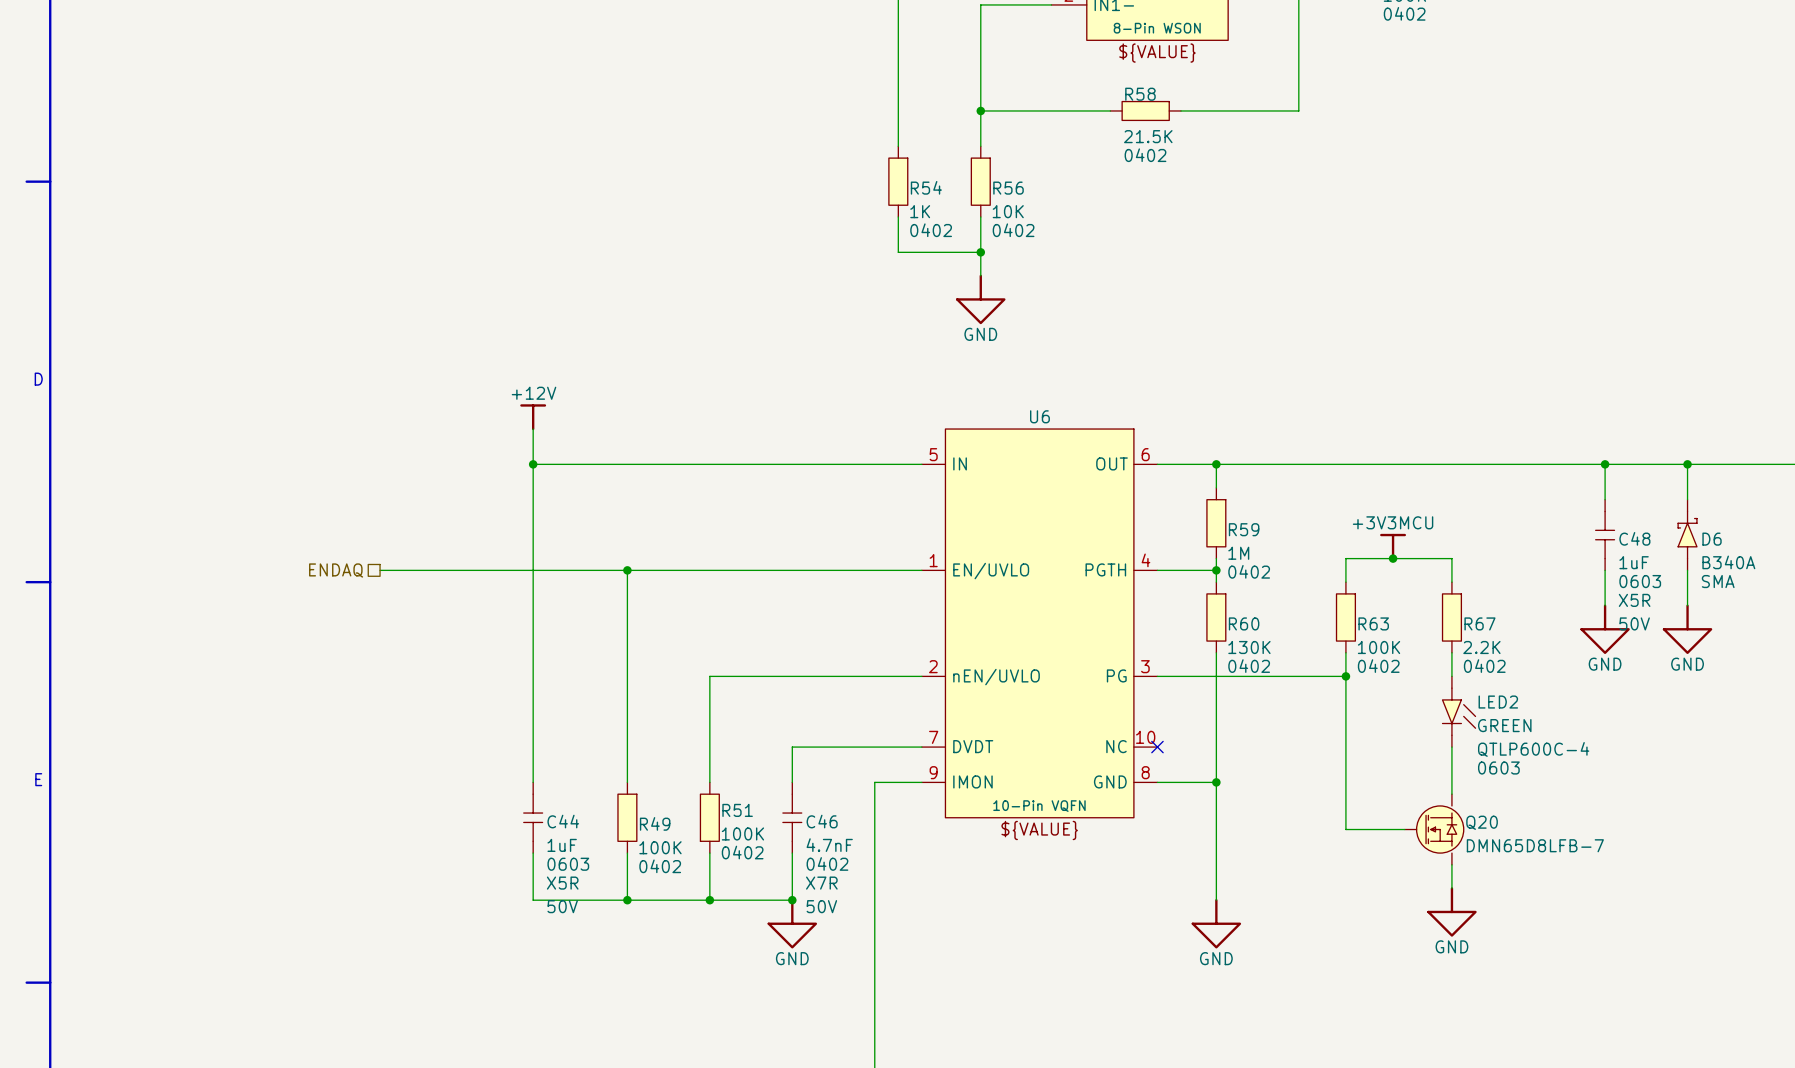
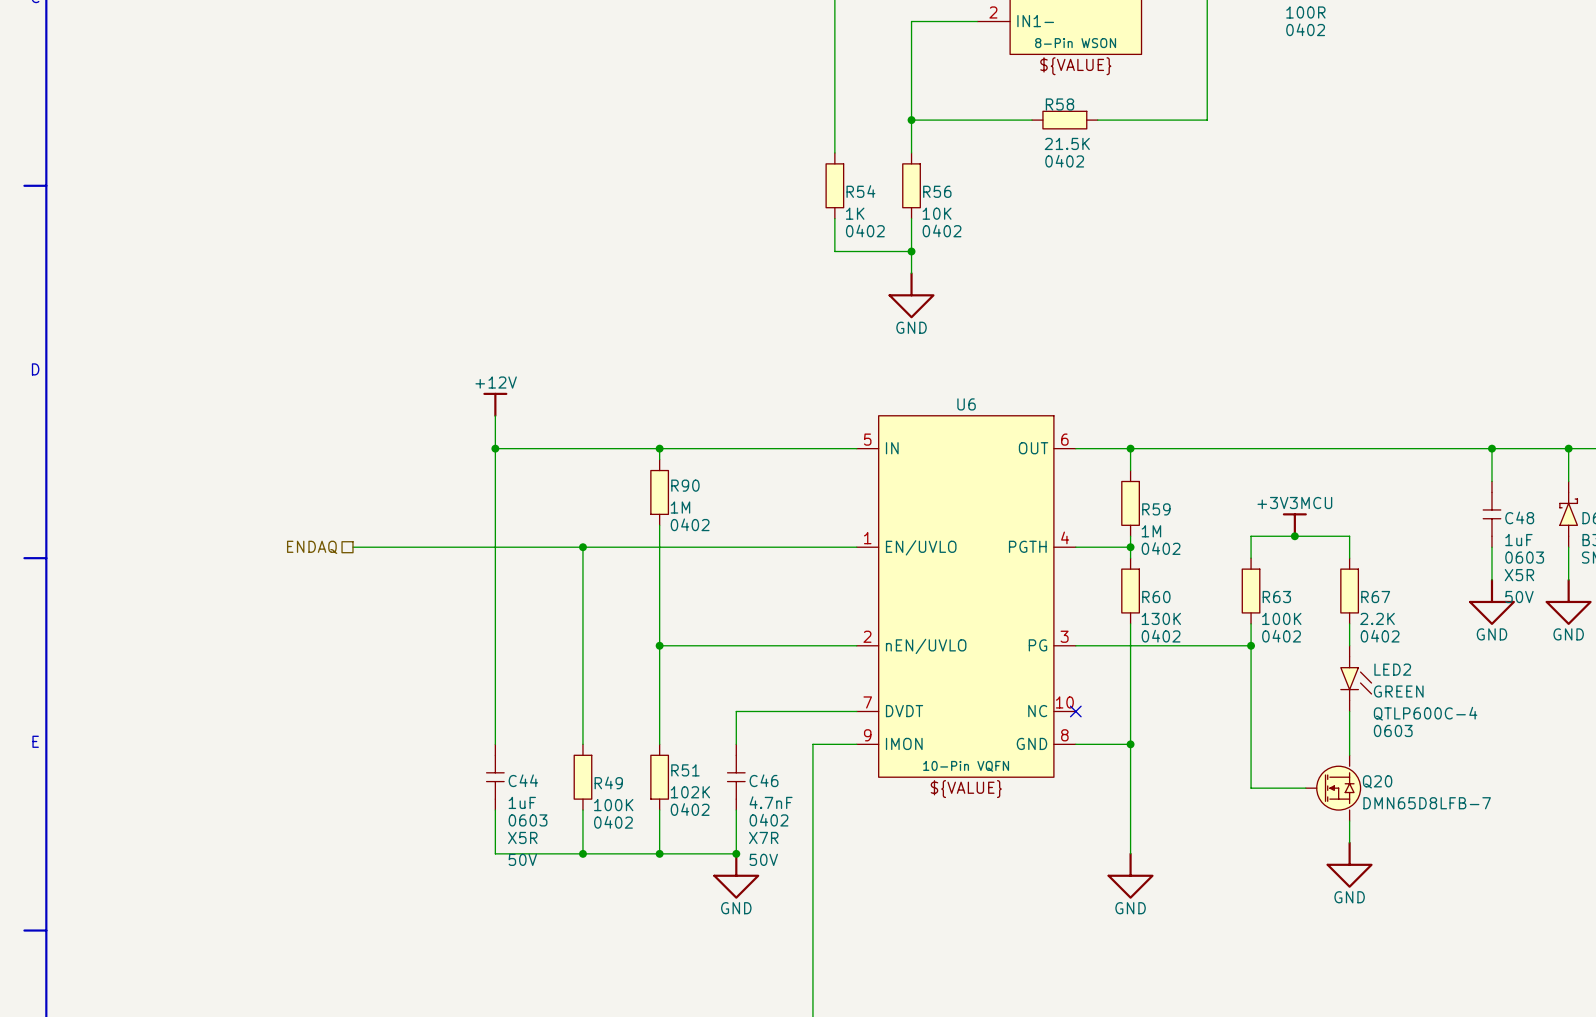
wire: none -> (659, 448) (659, 459)
junction: none -> (659, 448)
R90: none -> (659, 492)
wire: none -> (659, 525) (659, 645)
junction: none -> (659, 645)
R51 text: 100K (742, 833) -> 102K (690, 792)

